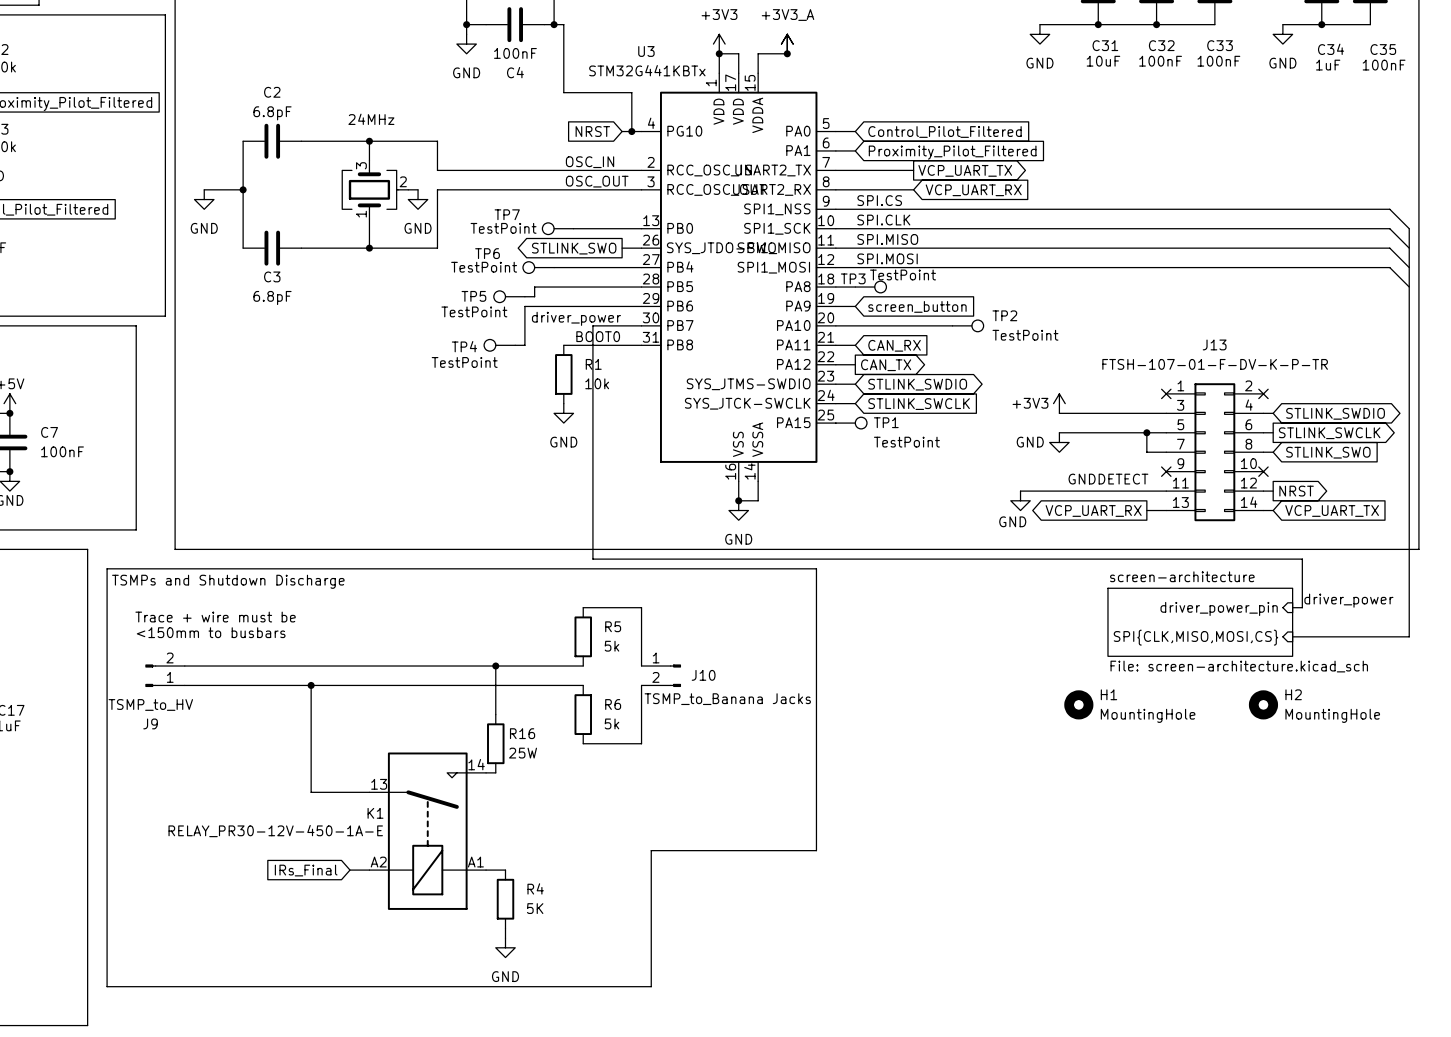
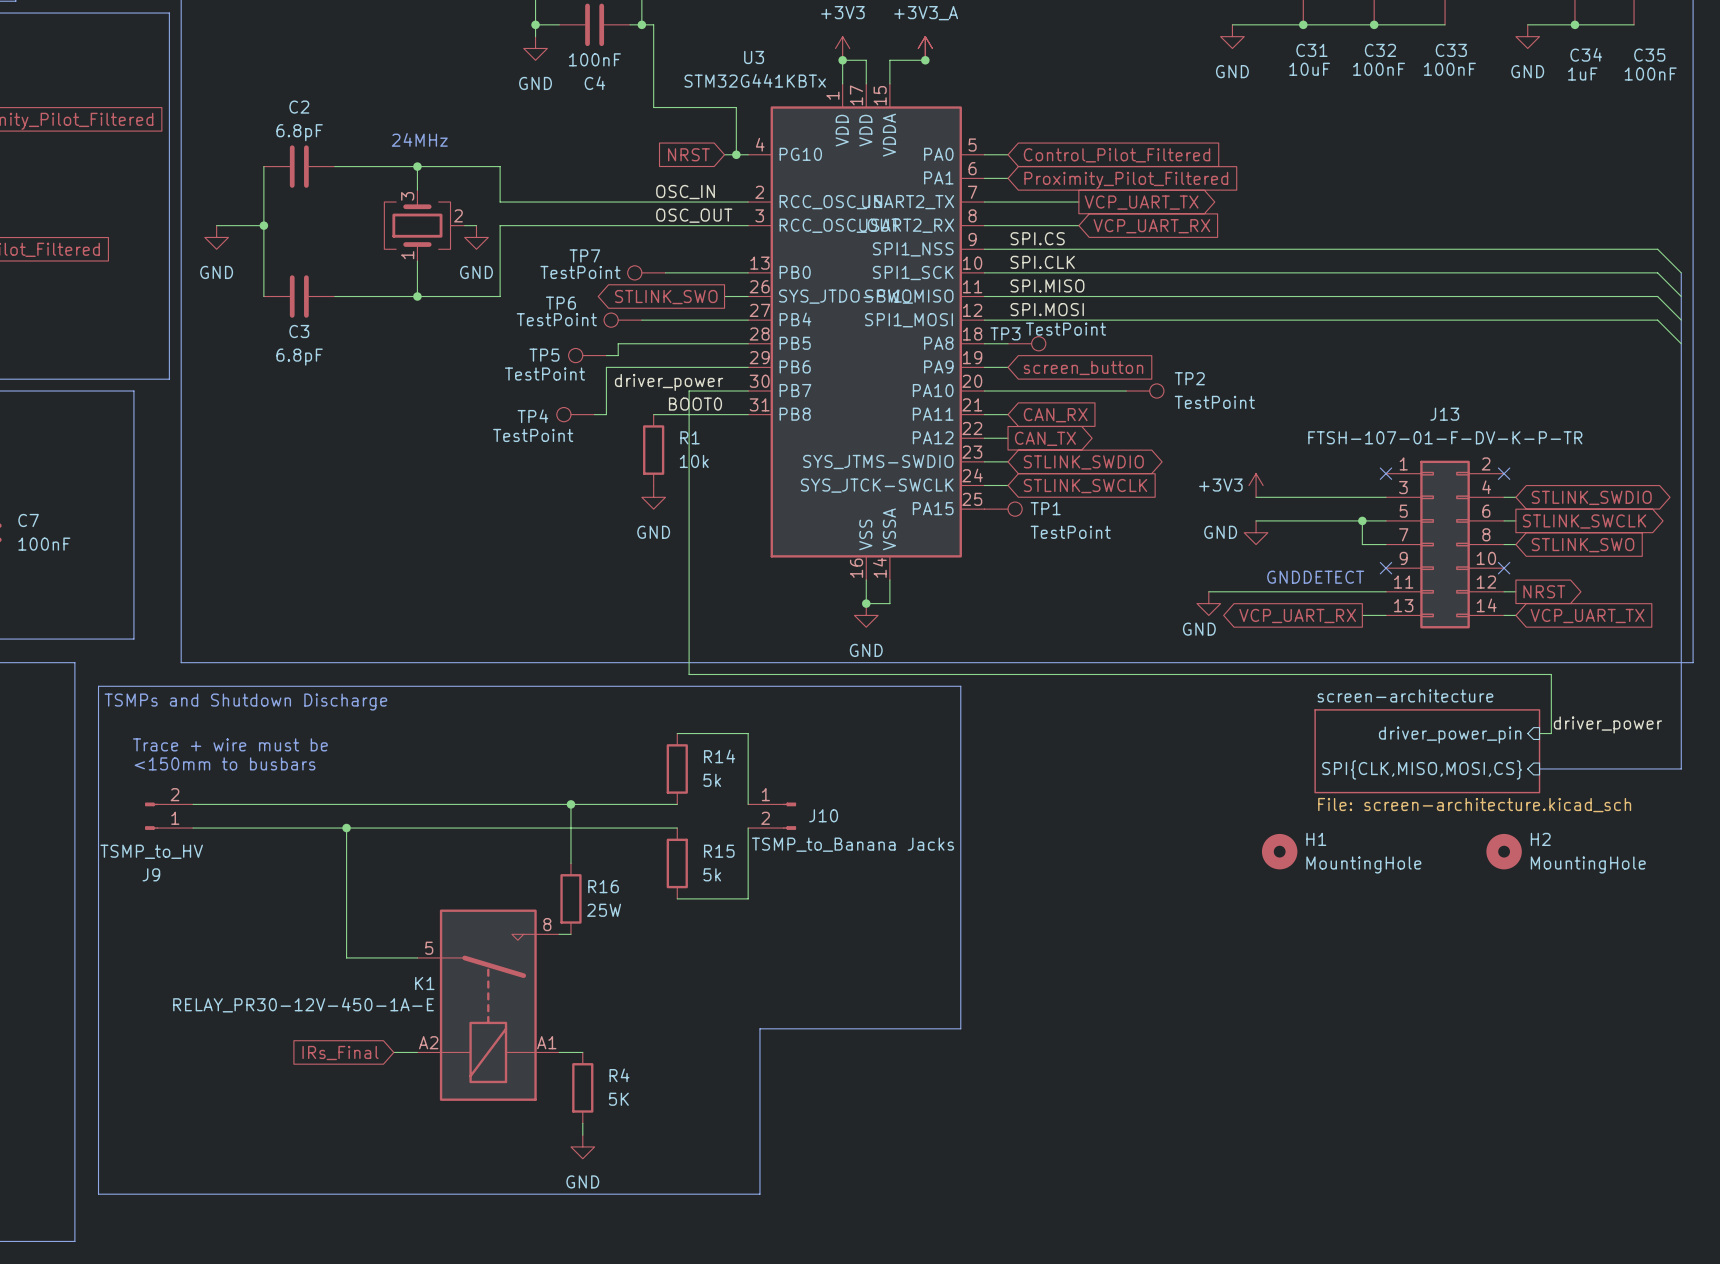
R5 name: R5 (613, 626) -> R14 (719, 756)
R6 name: R6 (613, 704) -> R15 (719, 851)
K1 pin number: 14 (476, 764) -> 8 (547, 924)
K1 pin number: 13 (379, 784) -> 5 (429, 948)

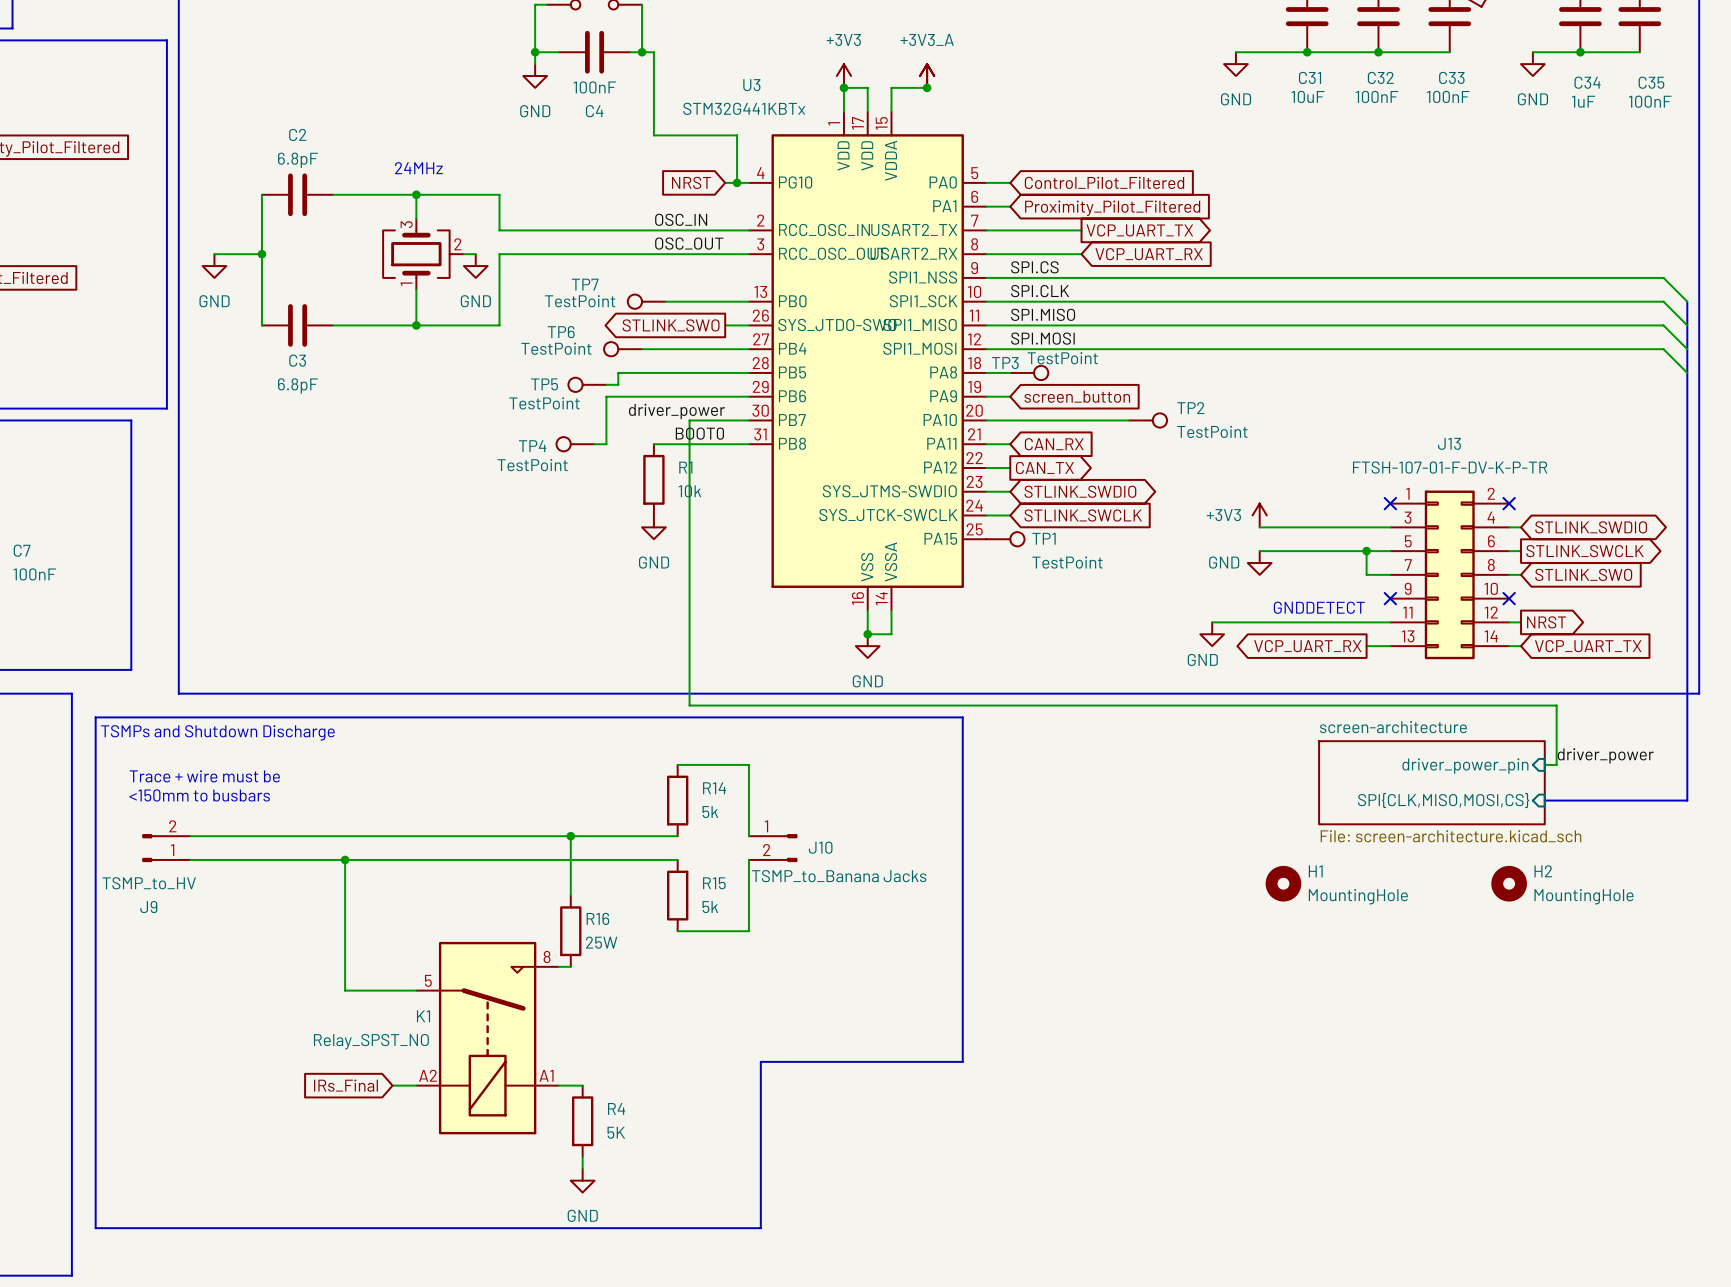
K1 value: RELAY_PR30-12V-450-1A-E (303, 1005) -> Relay_SPST_NO (371, 1041)

